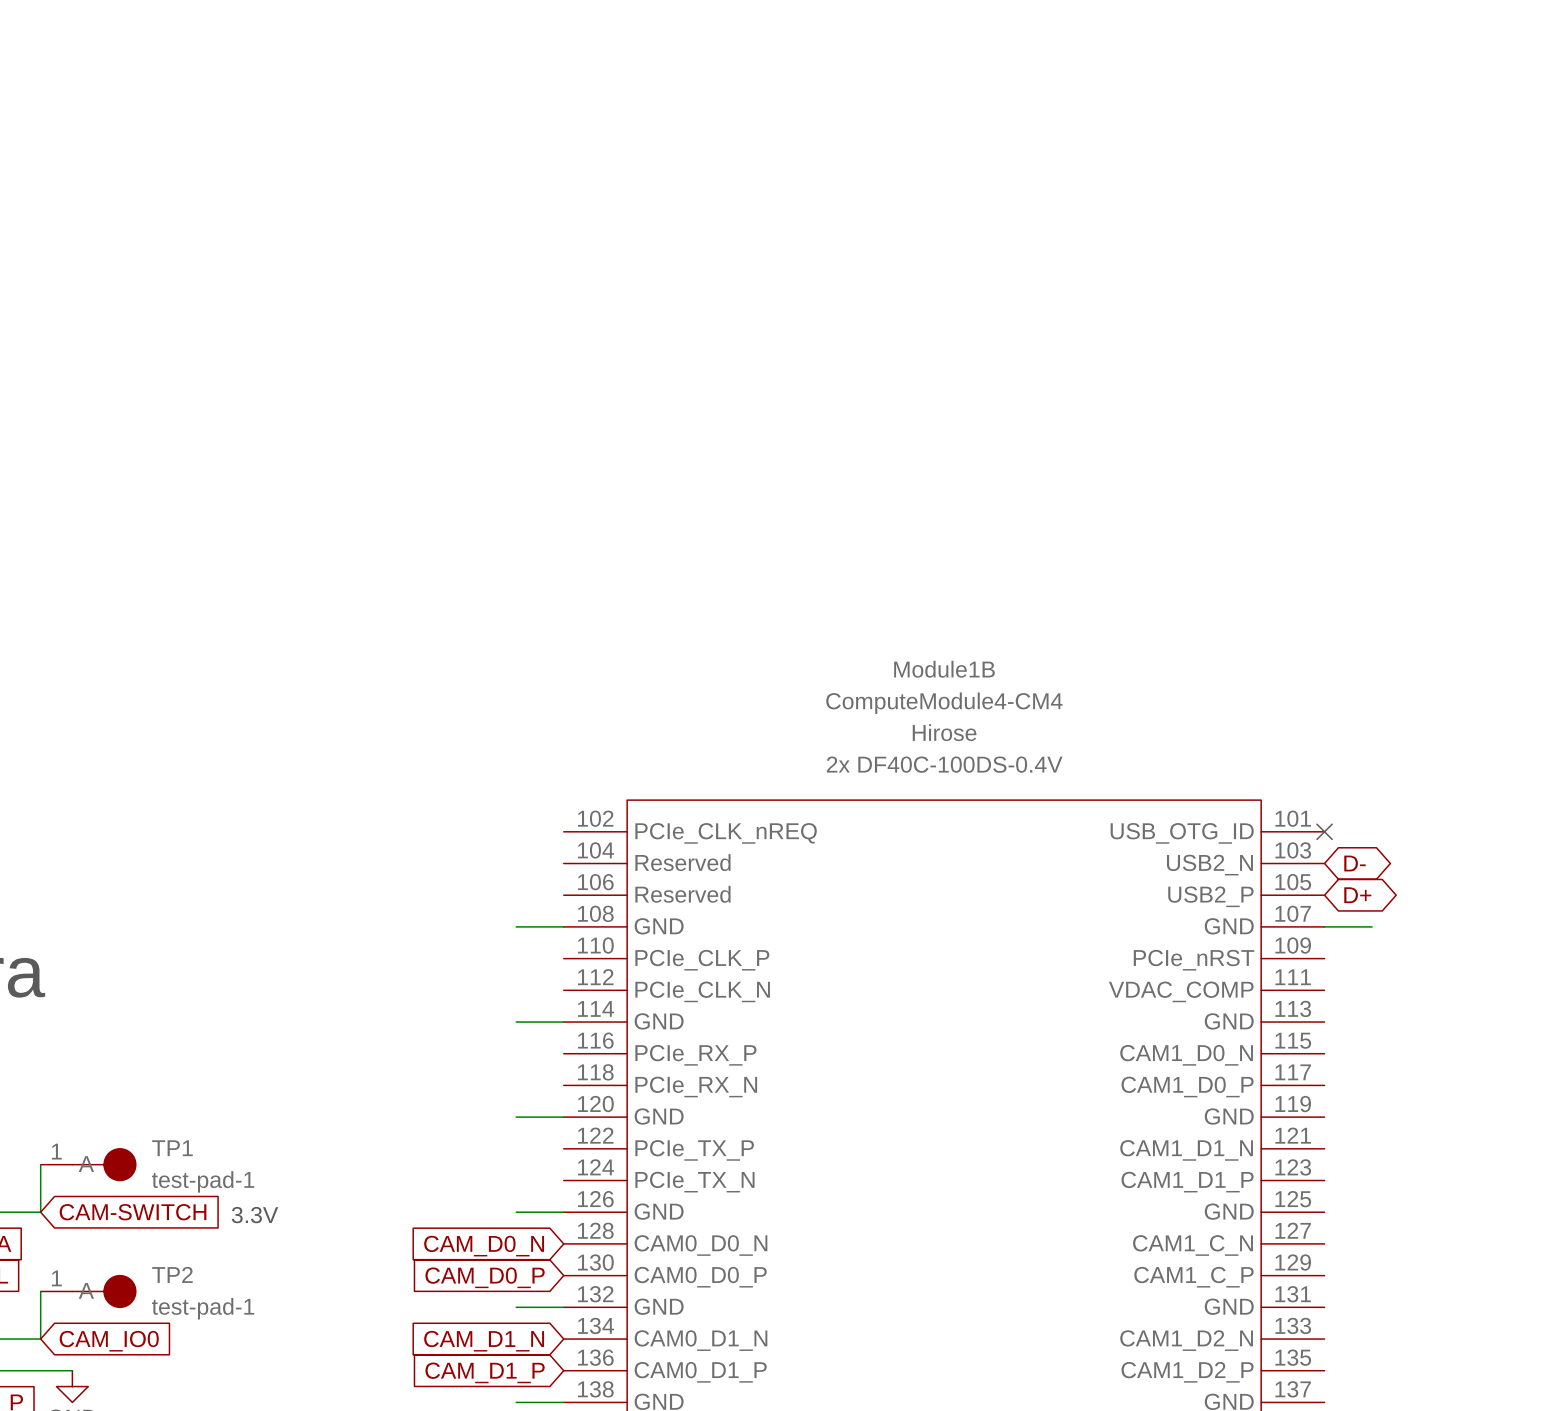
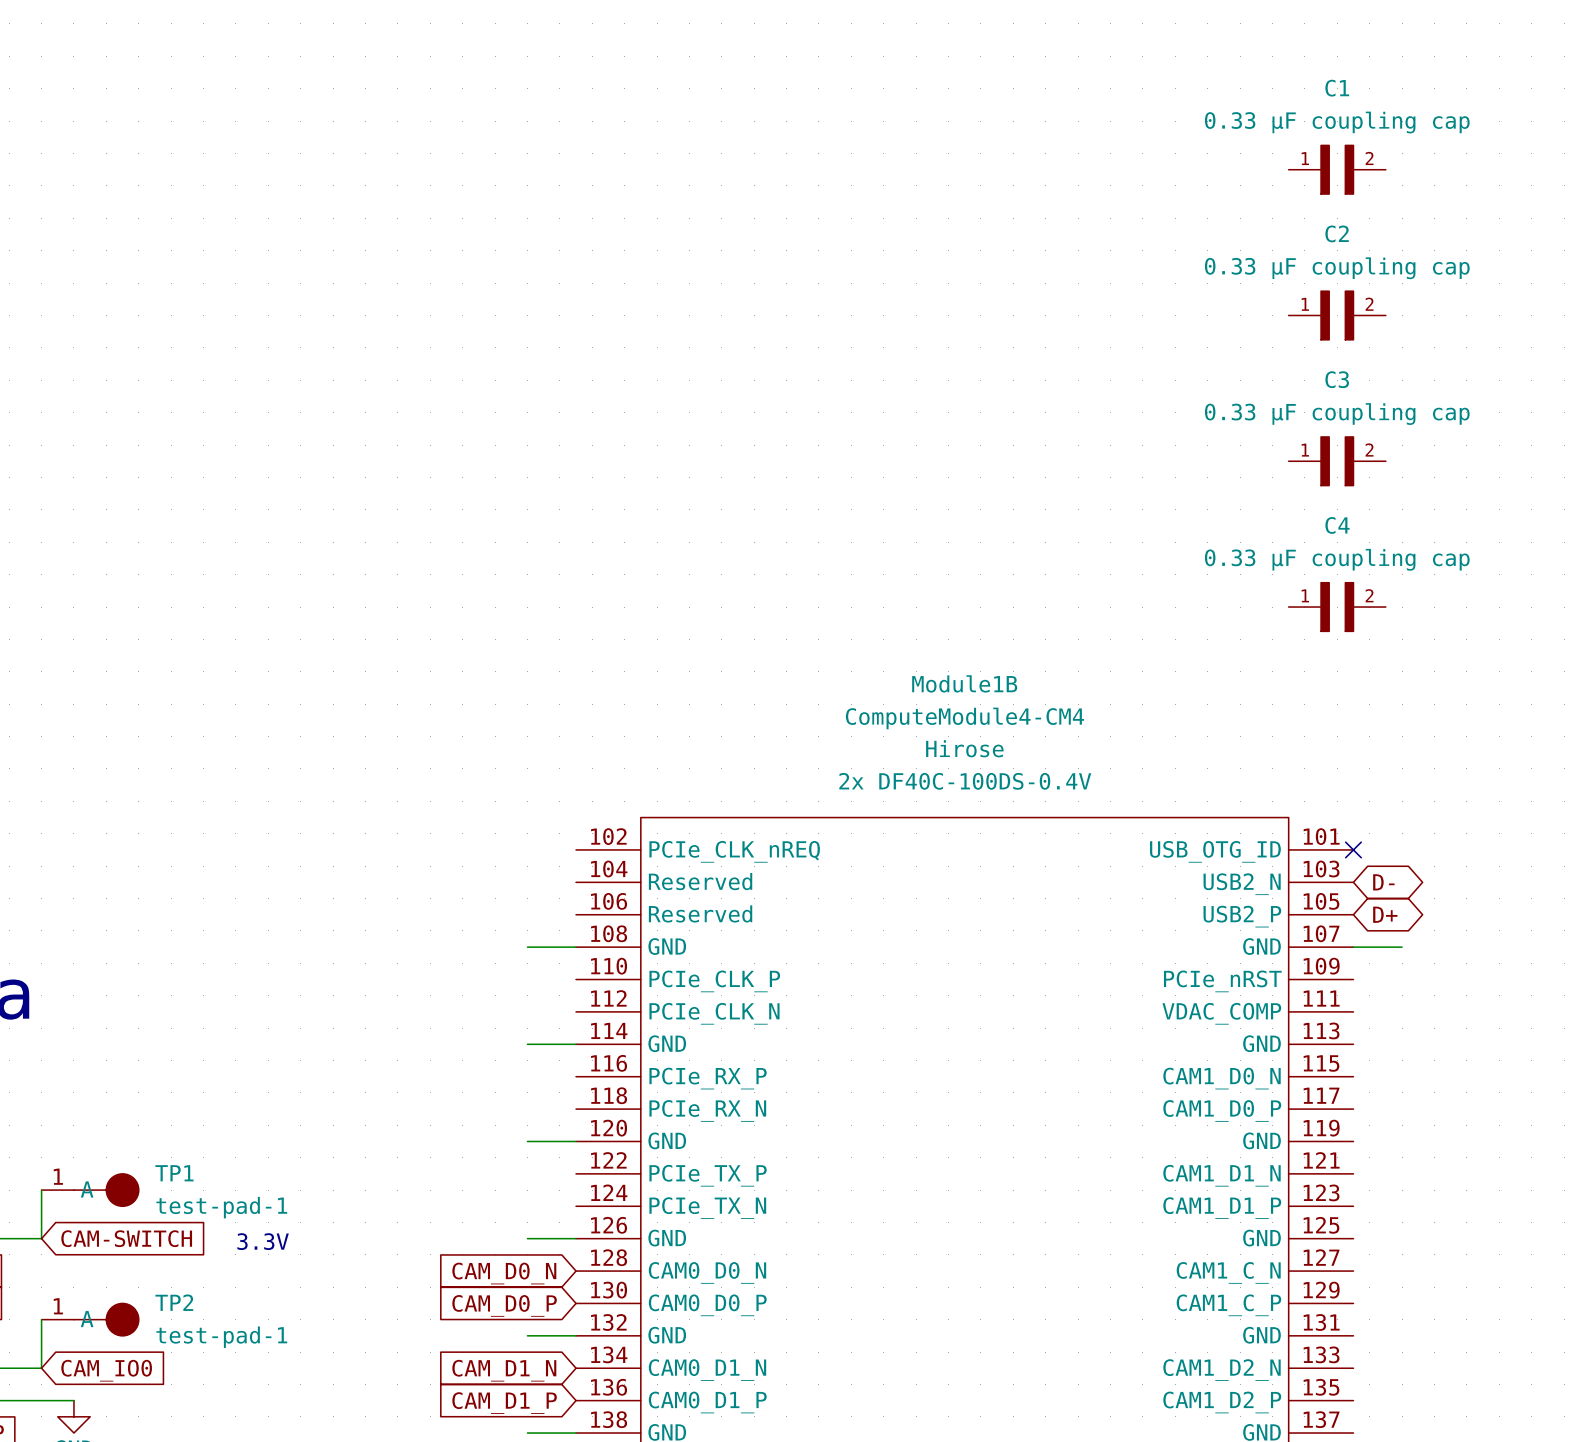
C1: none -> 0.33 µF coupling cap (1337, 169)
C2: none -> 0.33 µF coupling cap (1337, 315)
C3: none -> 0.33 µF coupling cap (1337, 461)
C4: none -> 0.33 µF coupling cap (1337, 607)

